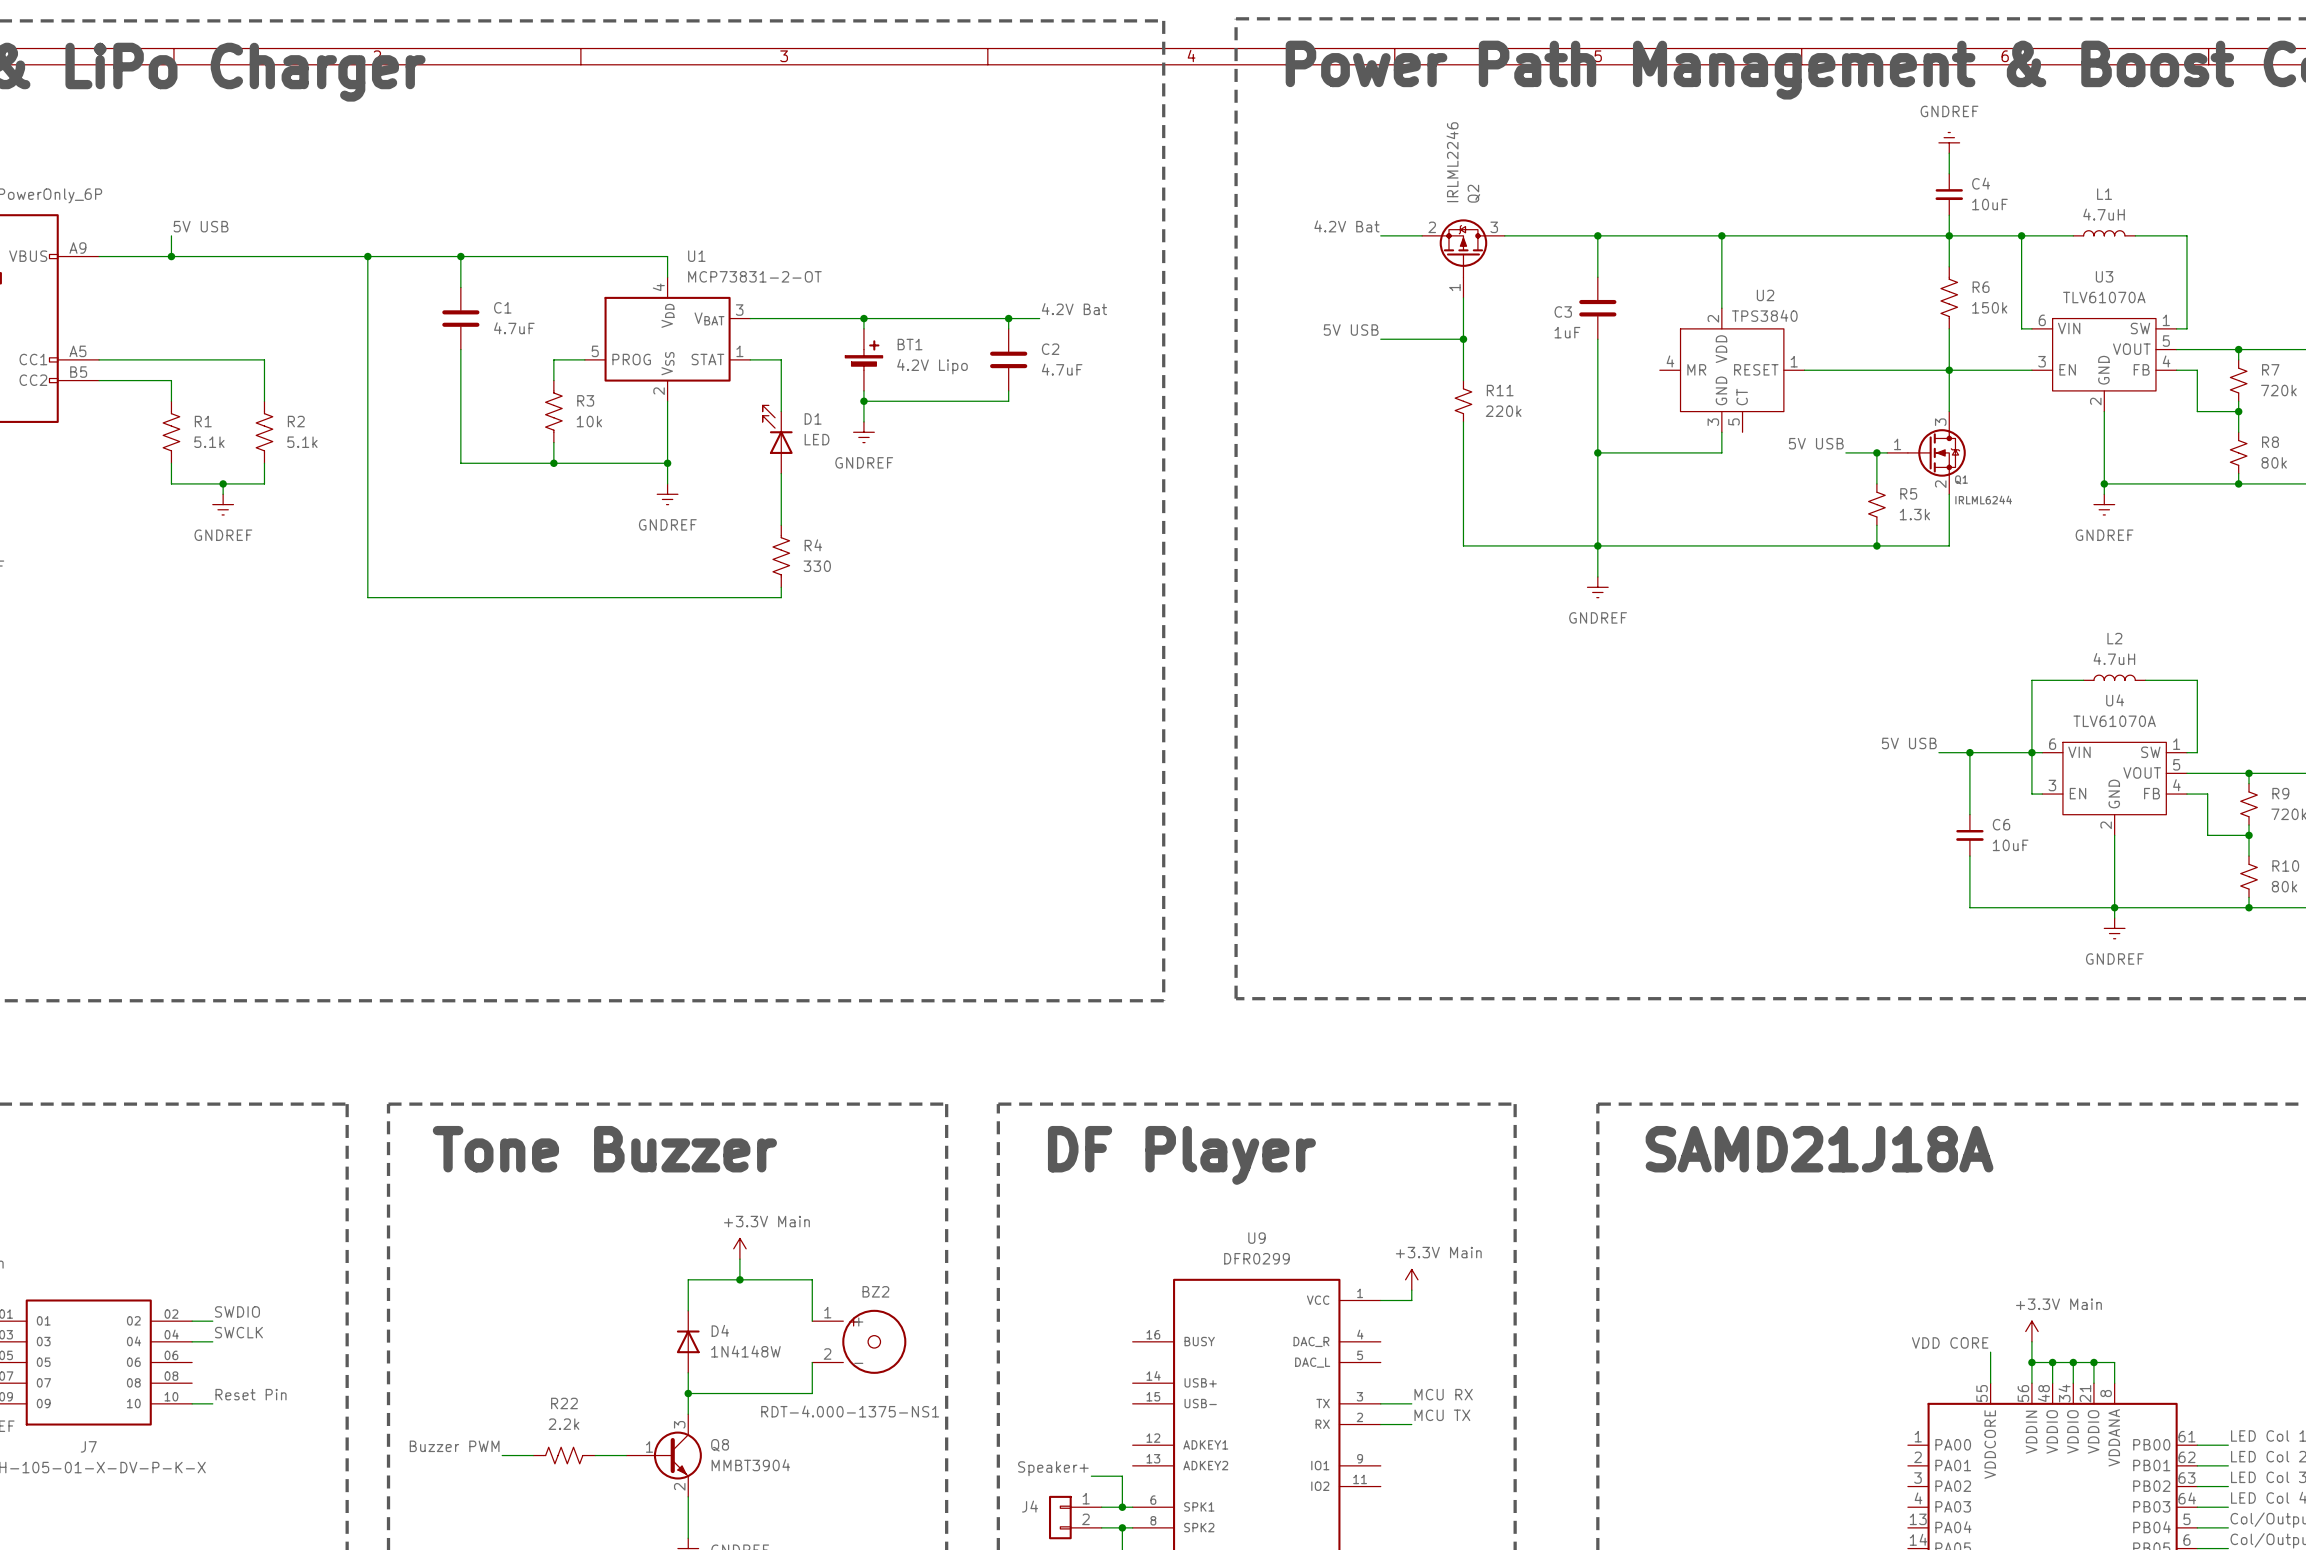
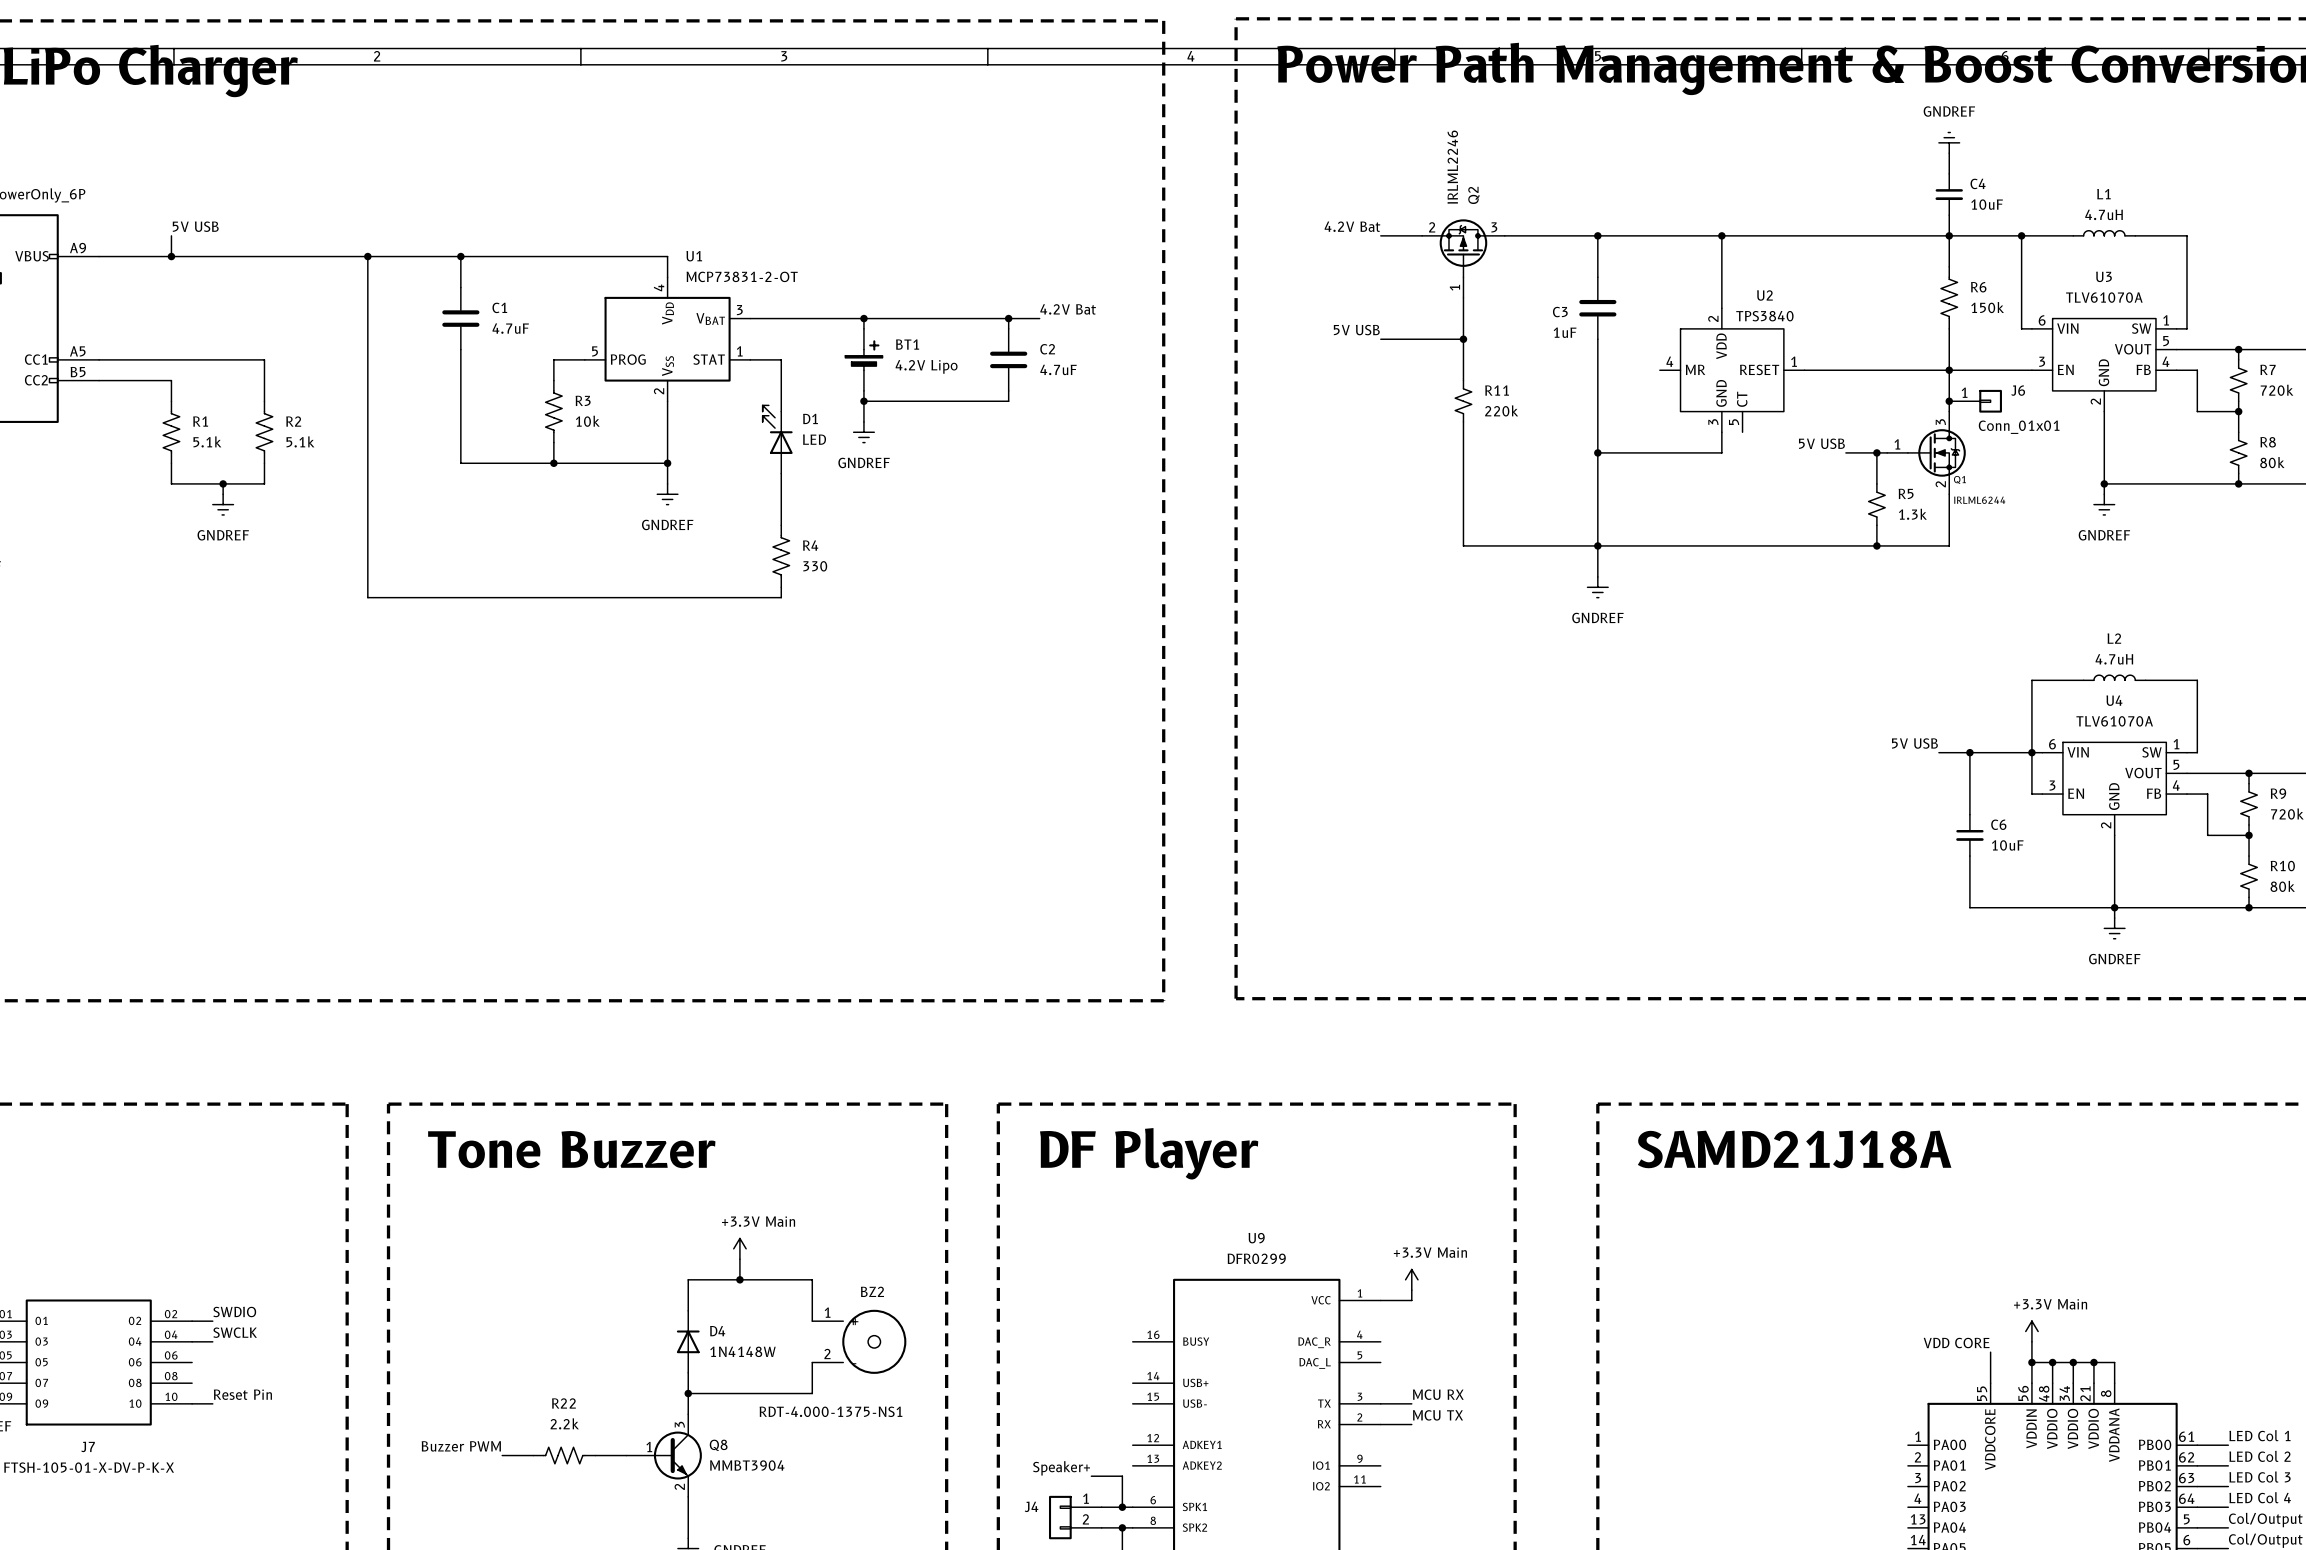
junction: none -> (1949, 401)
J6: none -> Conn_01x01 (1975, 401)

